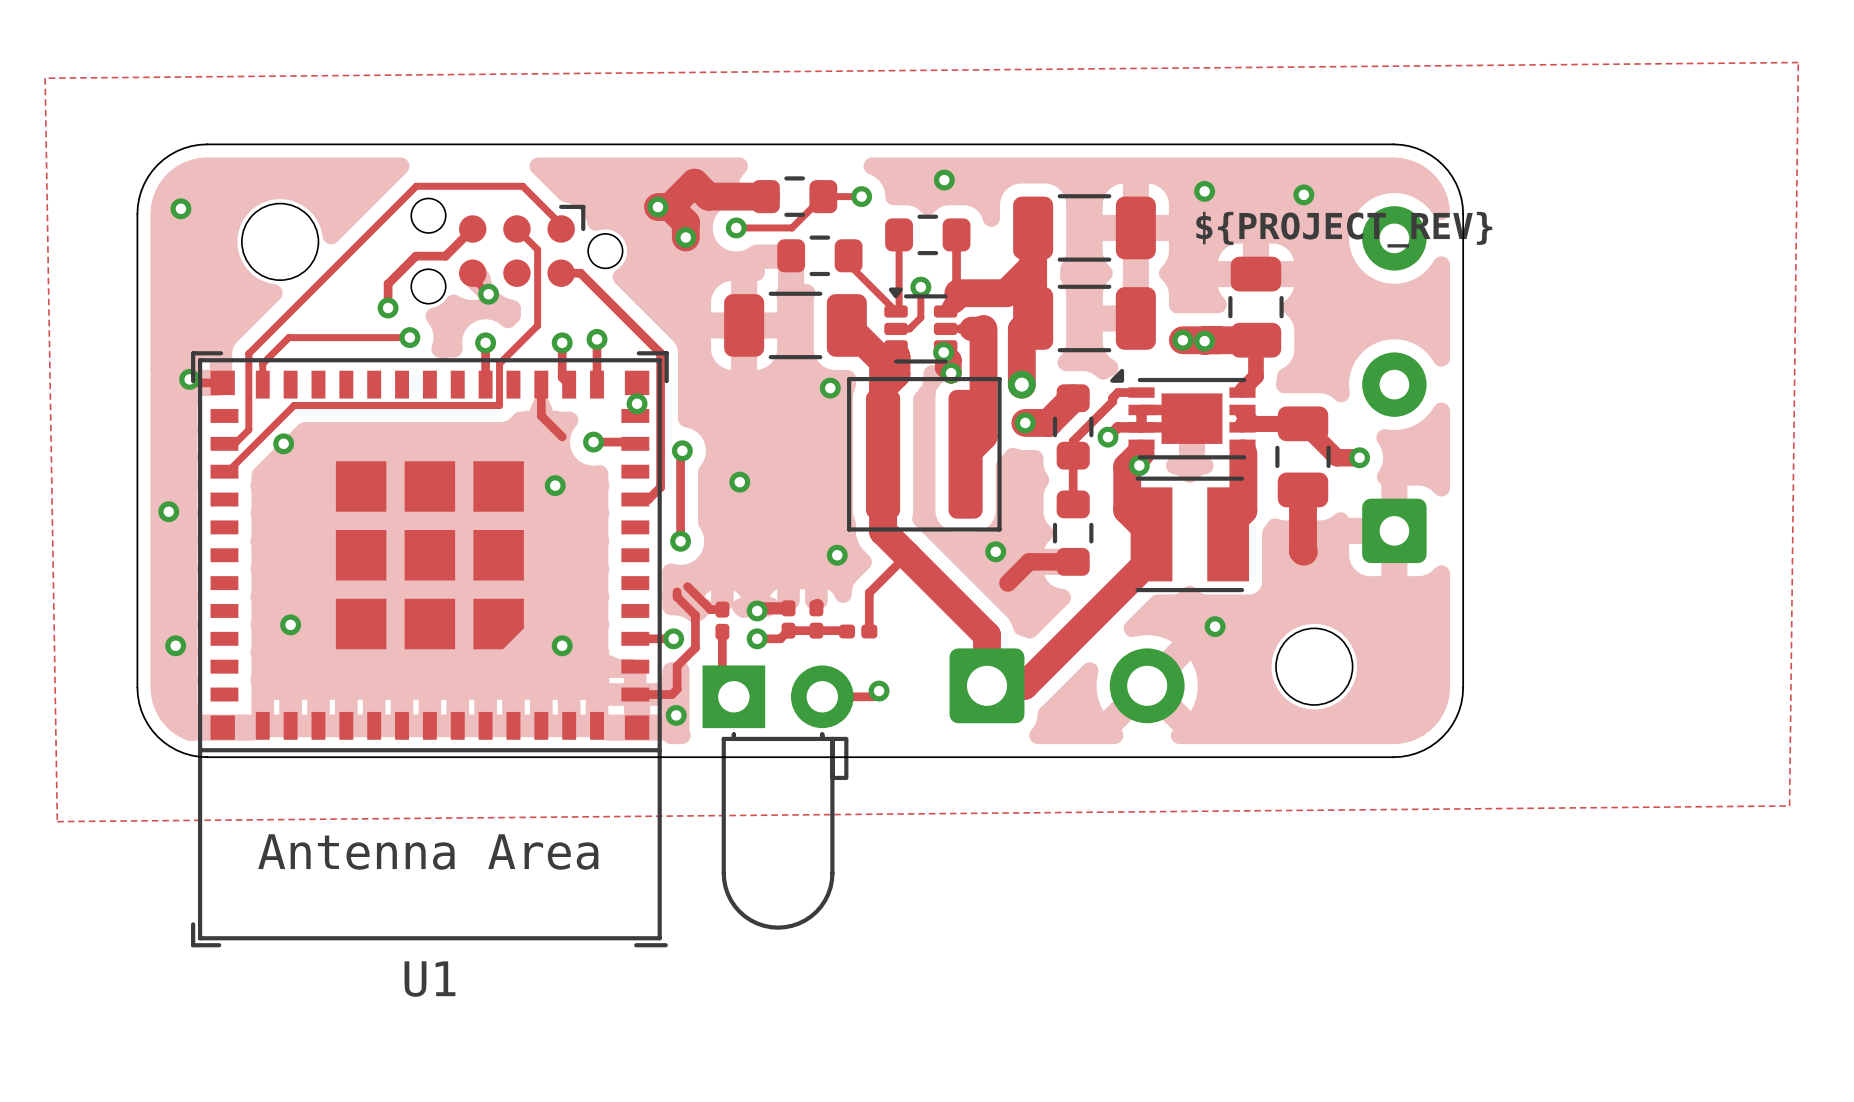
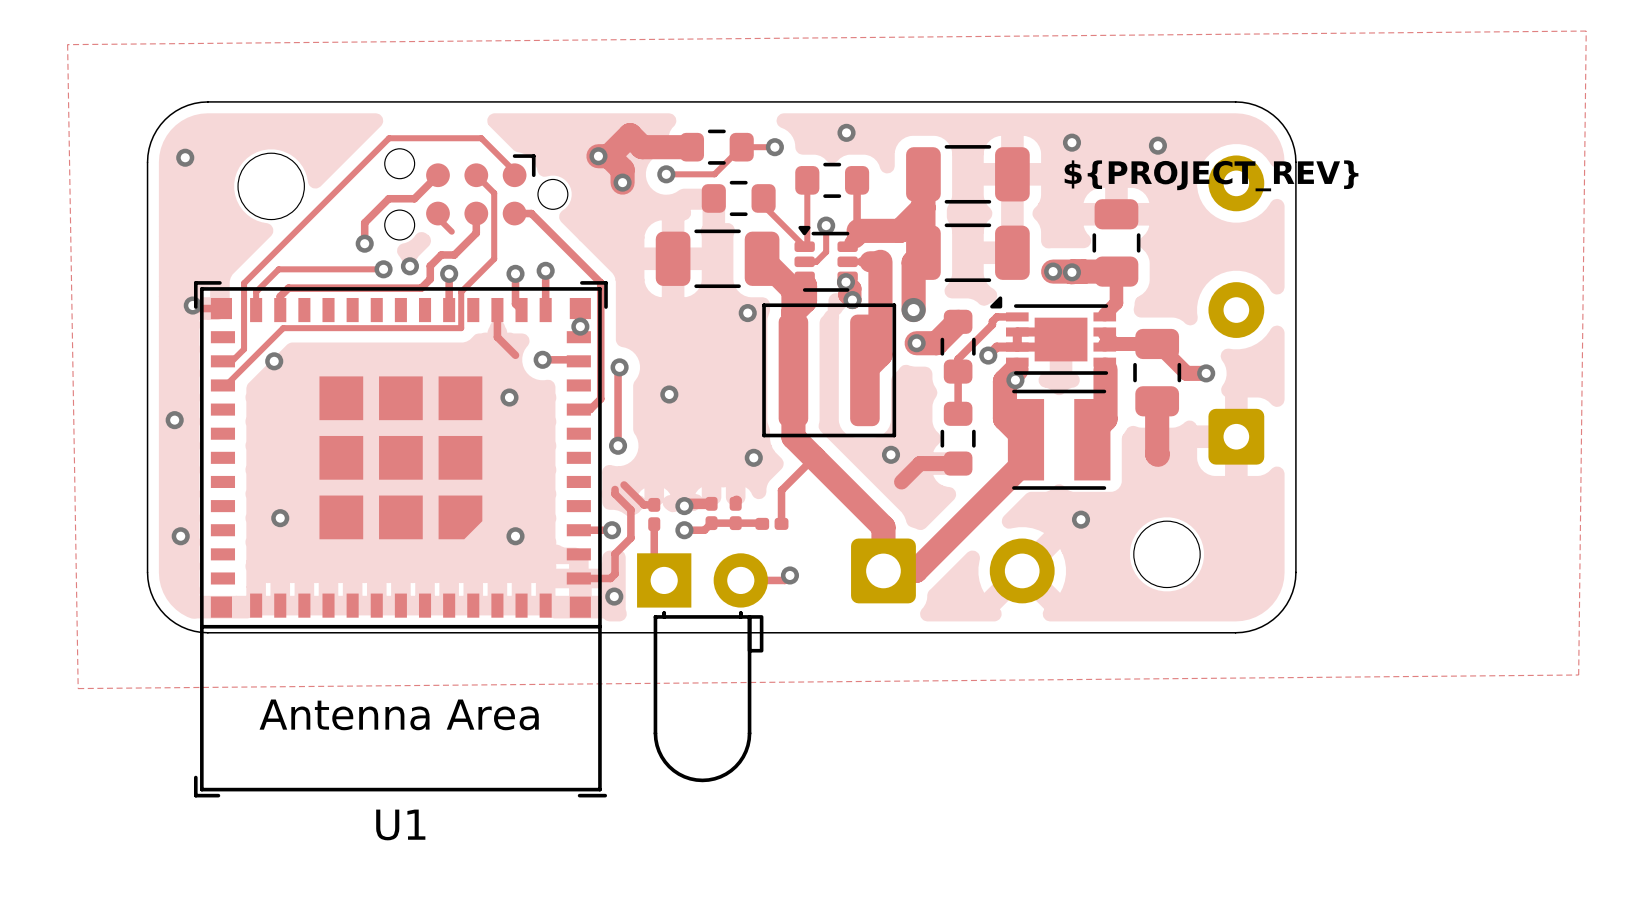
track: none -> (476, 213) (476, 233) (454, 254) (441, 254) (430, 266) (430, 279) (421, 288) (288, 288) (280, 296) (280, 310)
via position: (488, 294) -> (409, 266)

